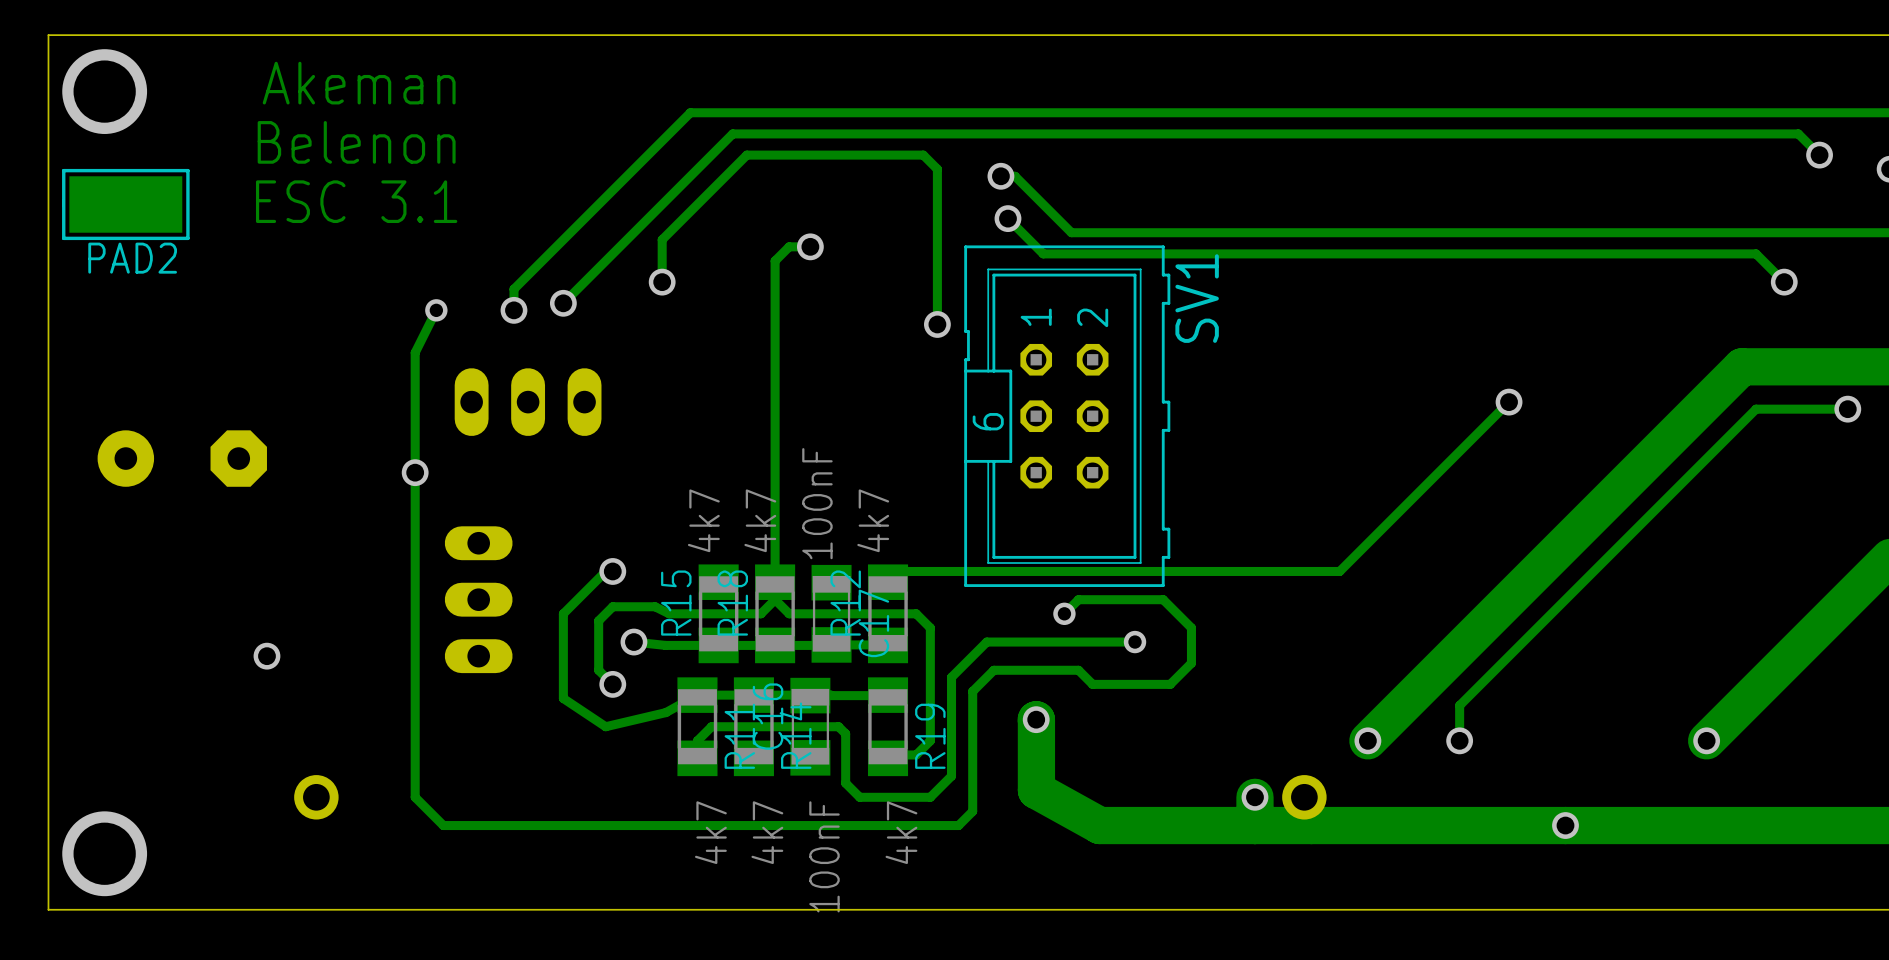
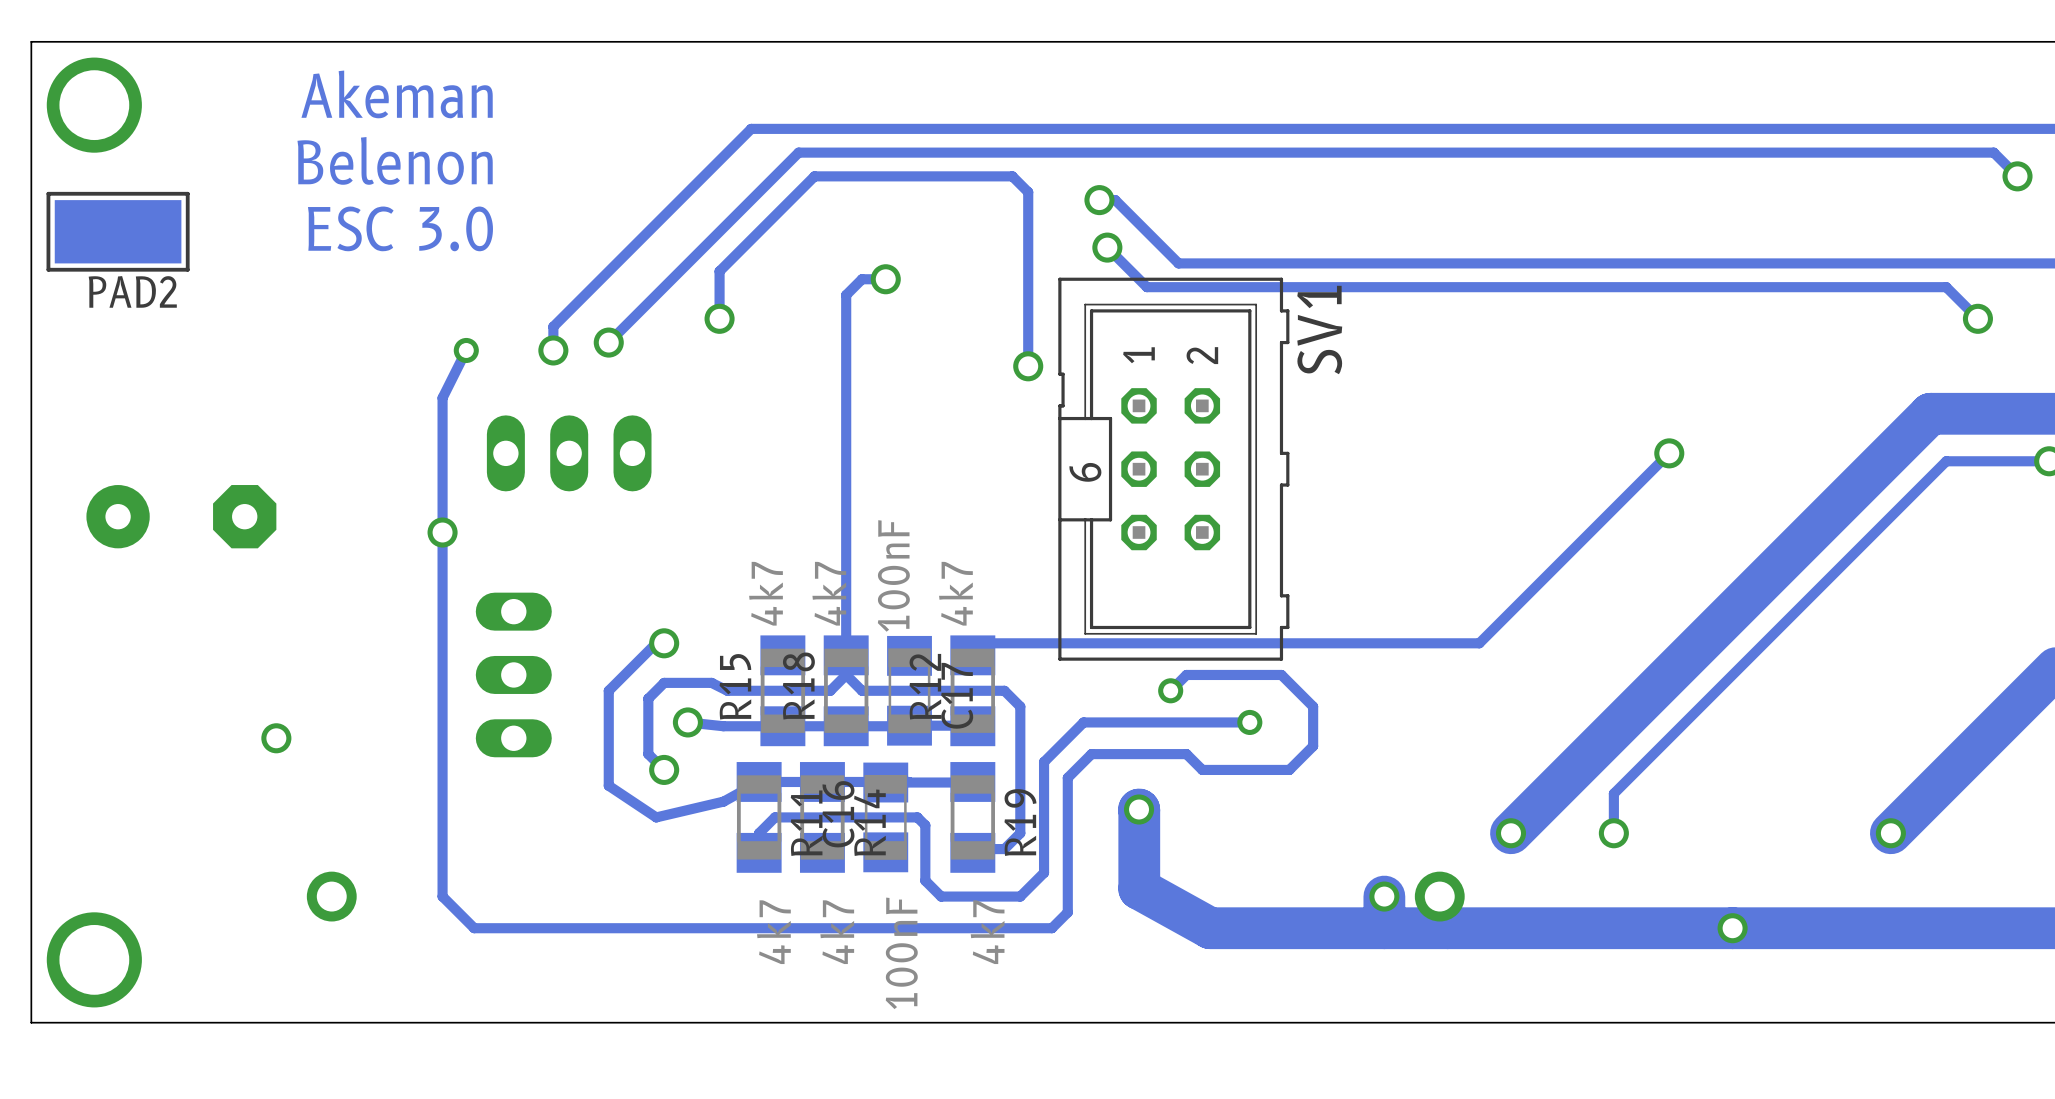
text: ESC 3.1 (356, 201) -> ESC 3.0 (400, 228)

